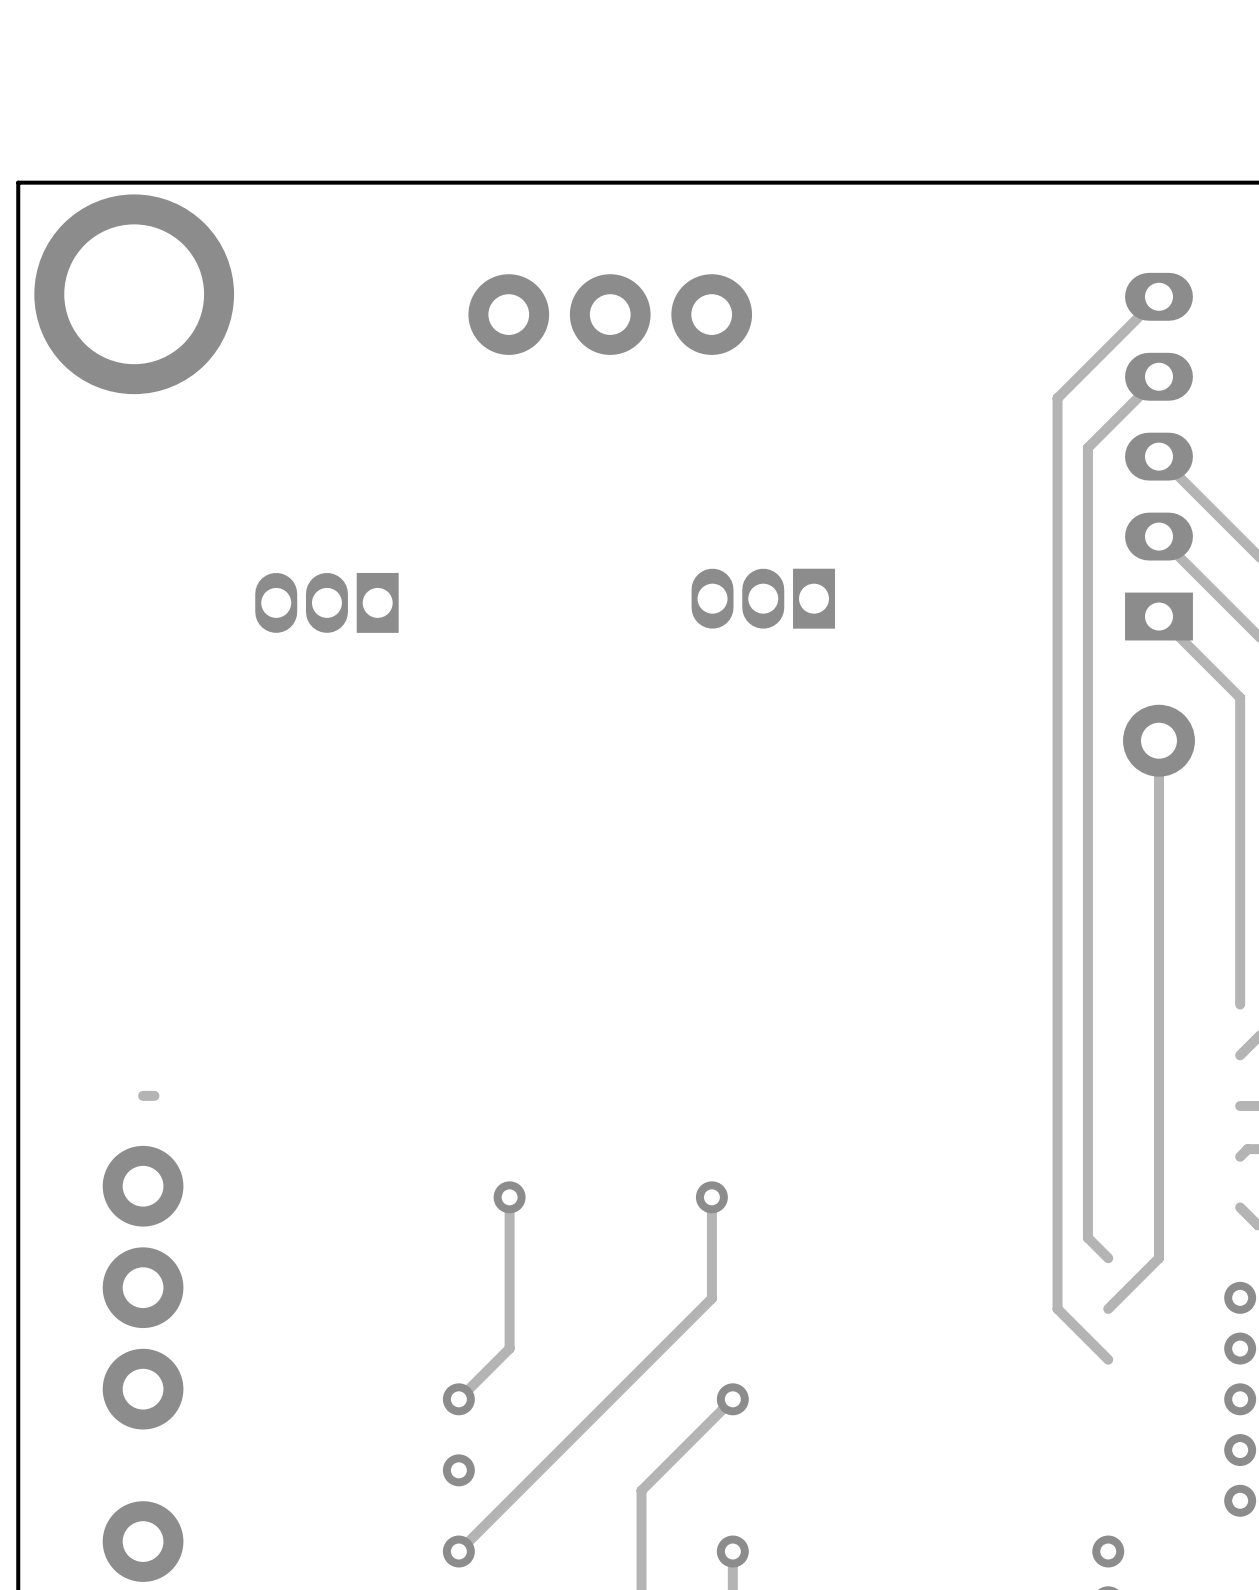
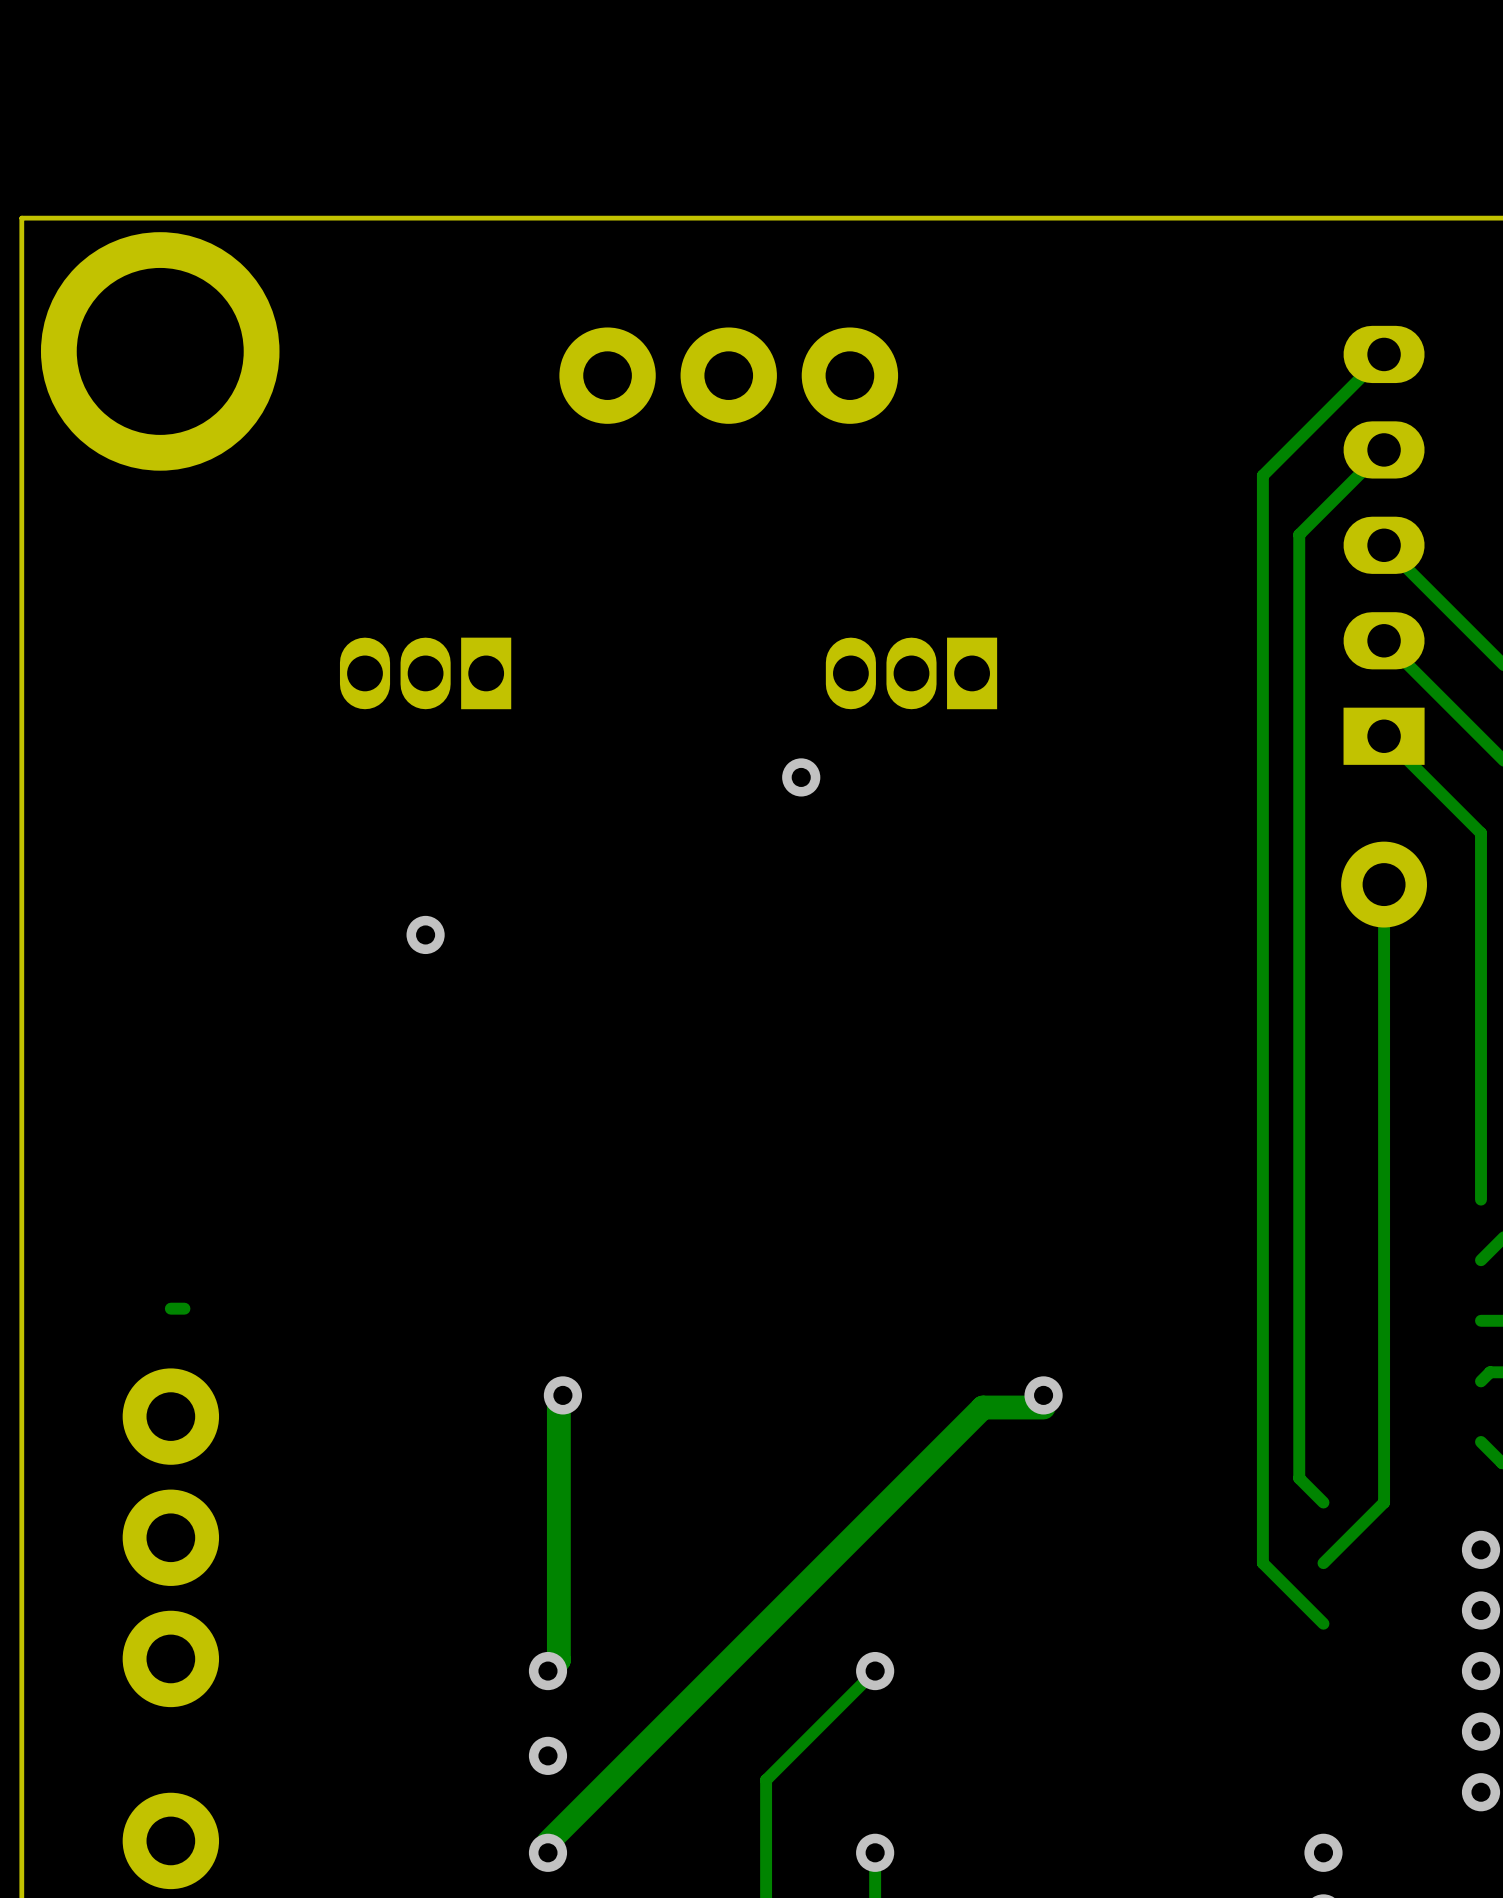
part position: (763, 598) -> (911, 673)
part position: (326, 602) -> (425, 673)
via: none -> (801, 777)
via: none -> (425, 934)
via: none -> (1043, 1395)
track: (509, 1197) (509, 1348) (468, 1390) -> (562, 1395) (558, 1399) (558, 1660)
via position: (509, 1197) -> (562, 1395)
track: (711, 1197) (711, 1298) (458, 1551) -> (1043, 1407) (982, 1407) (547, 1842) (547, 1852)
via: (711, 1197) -> none

